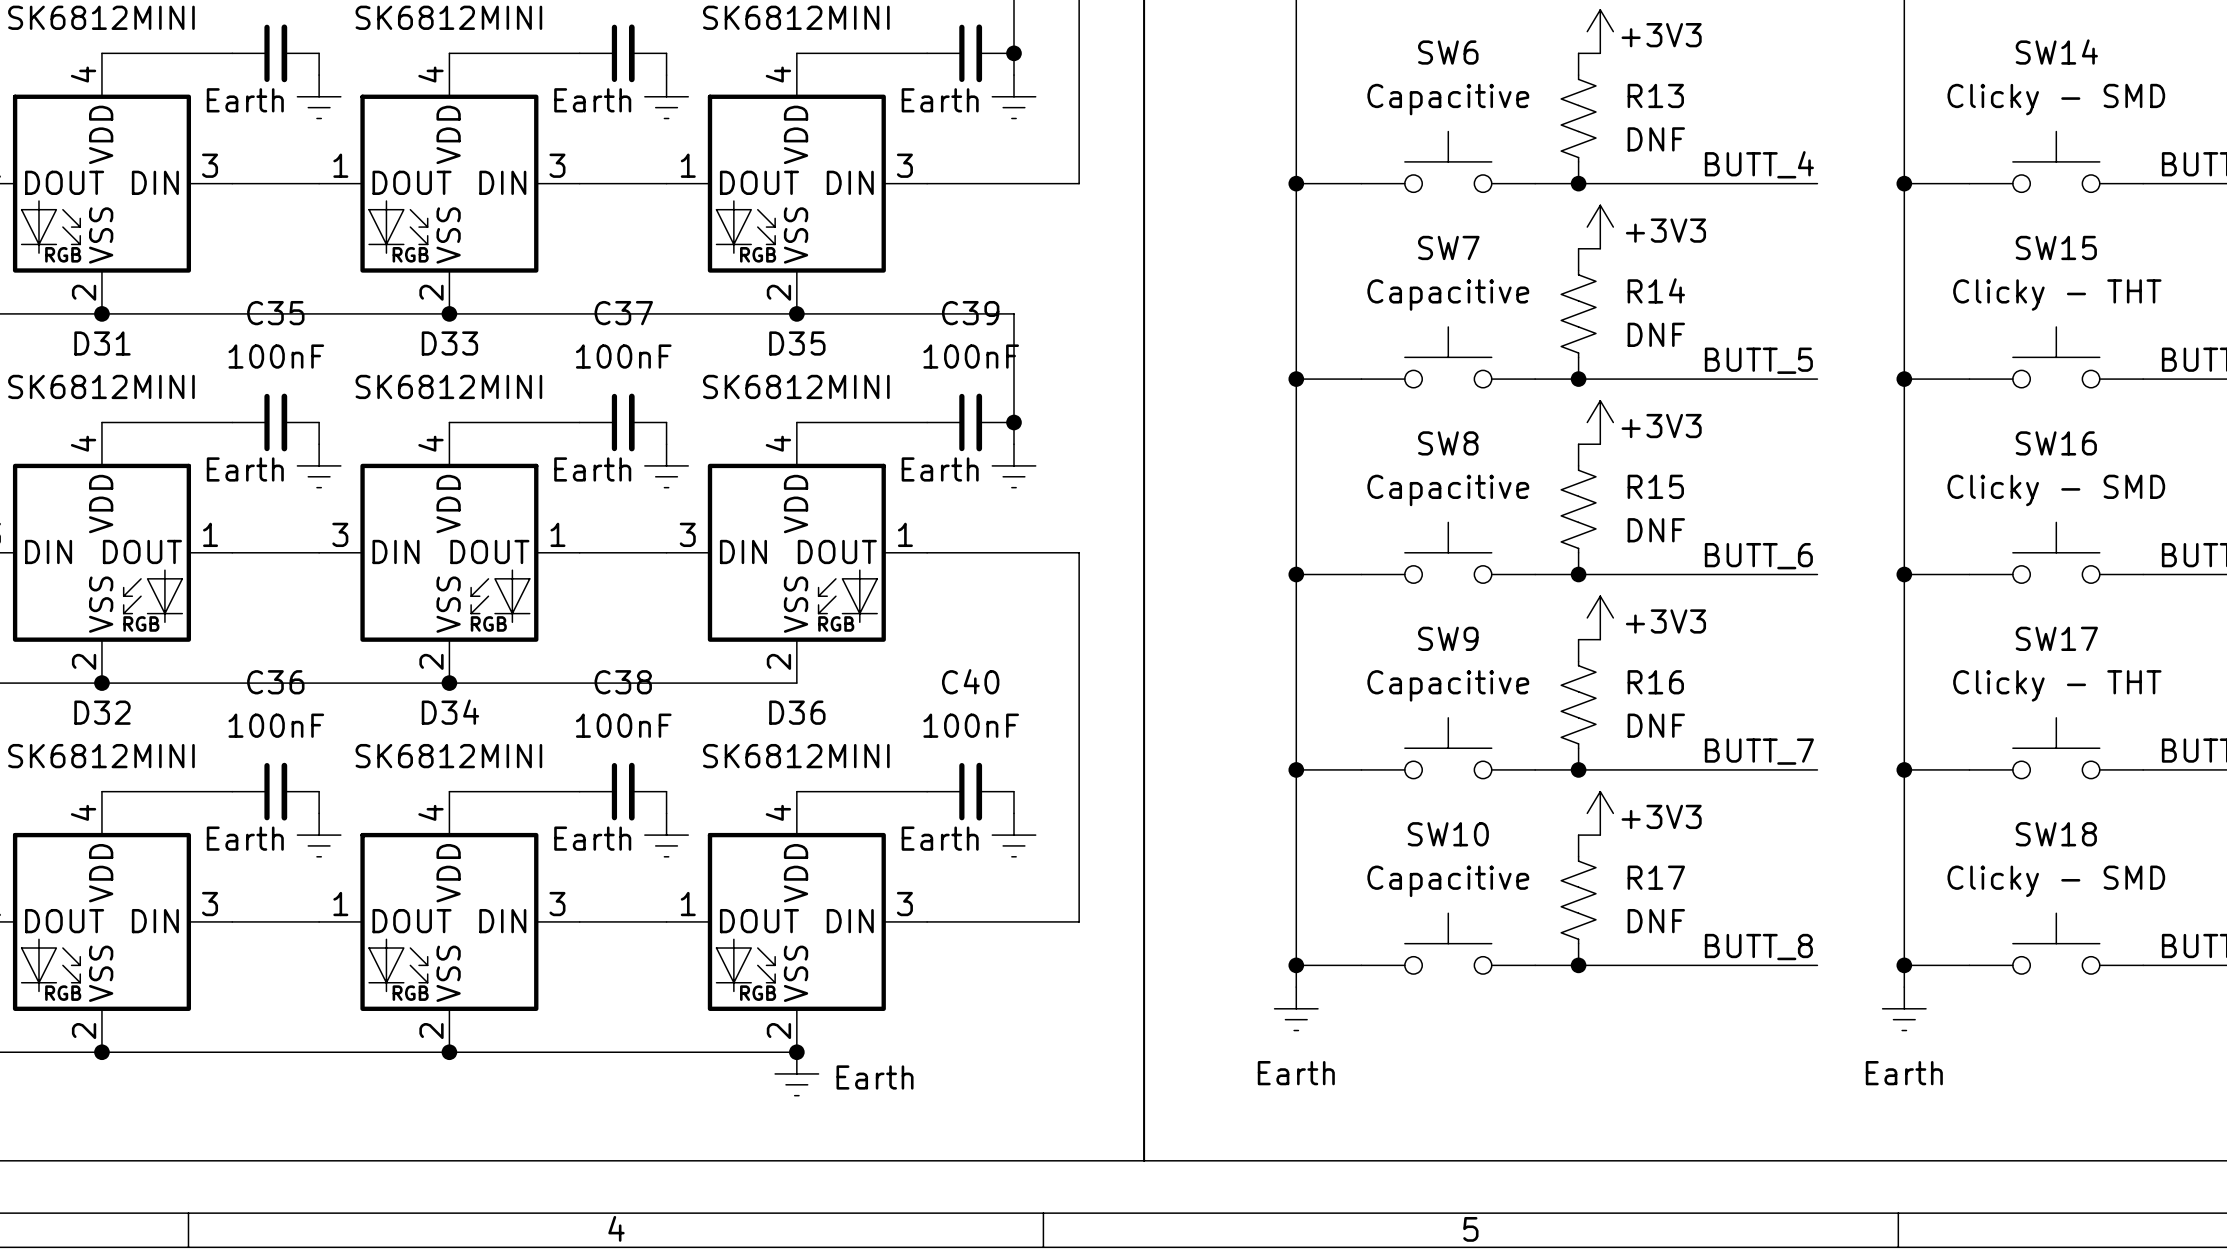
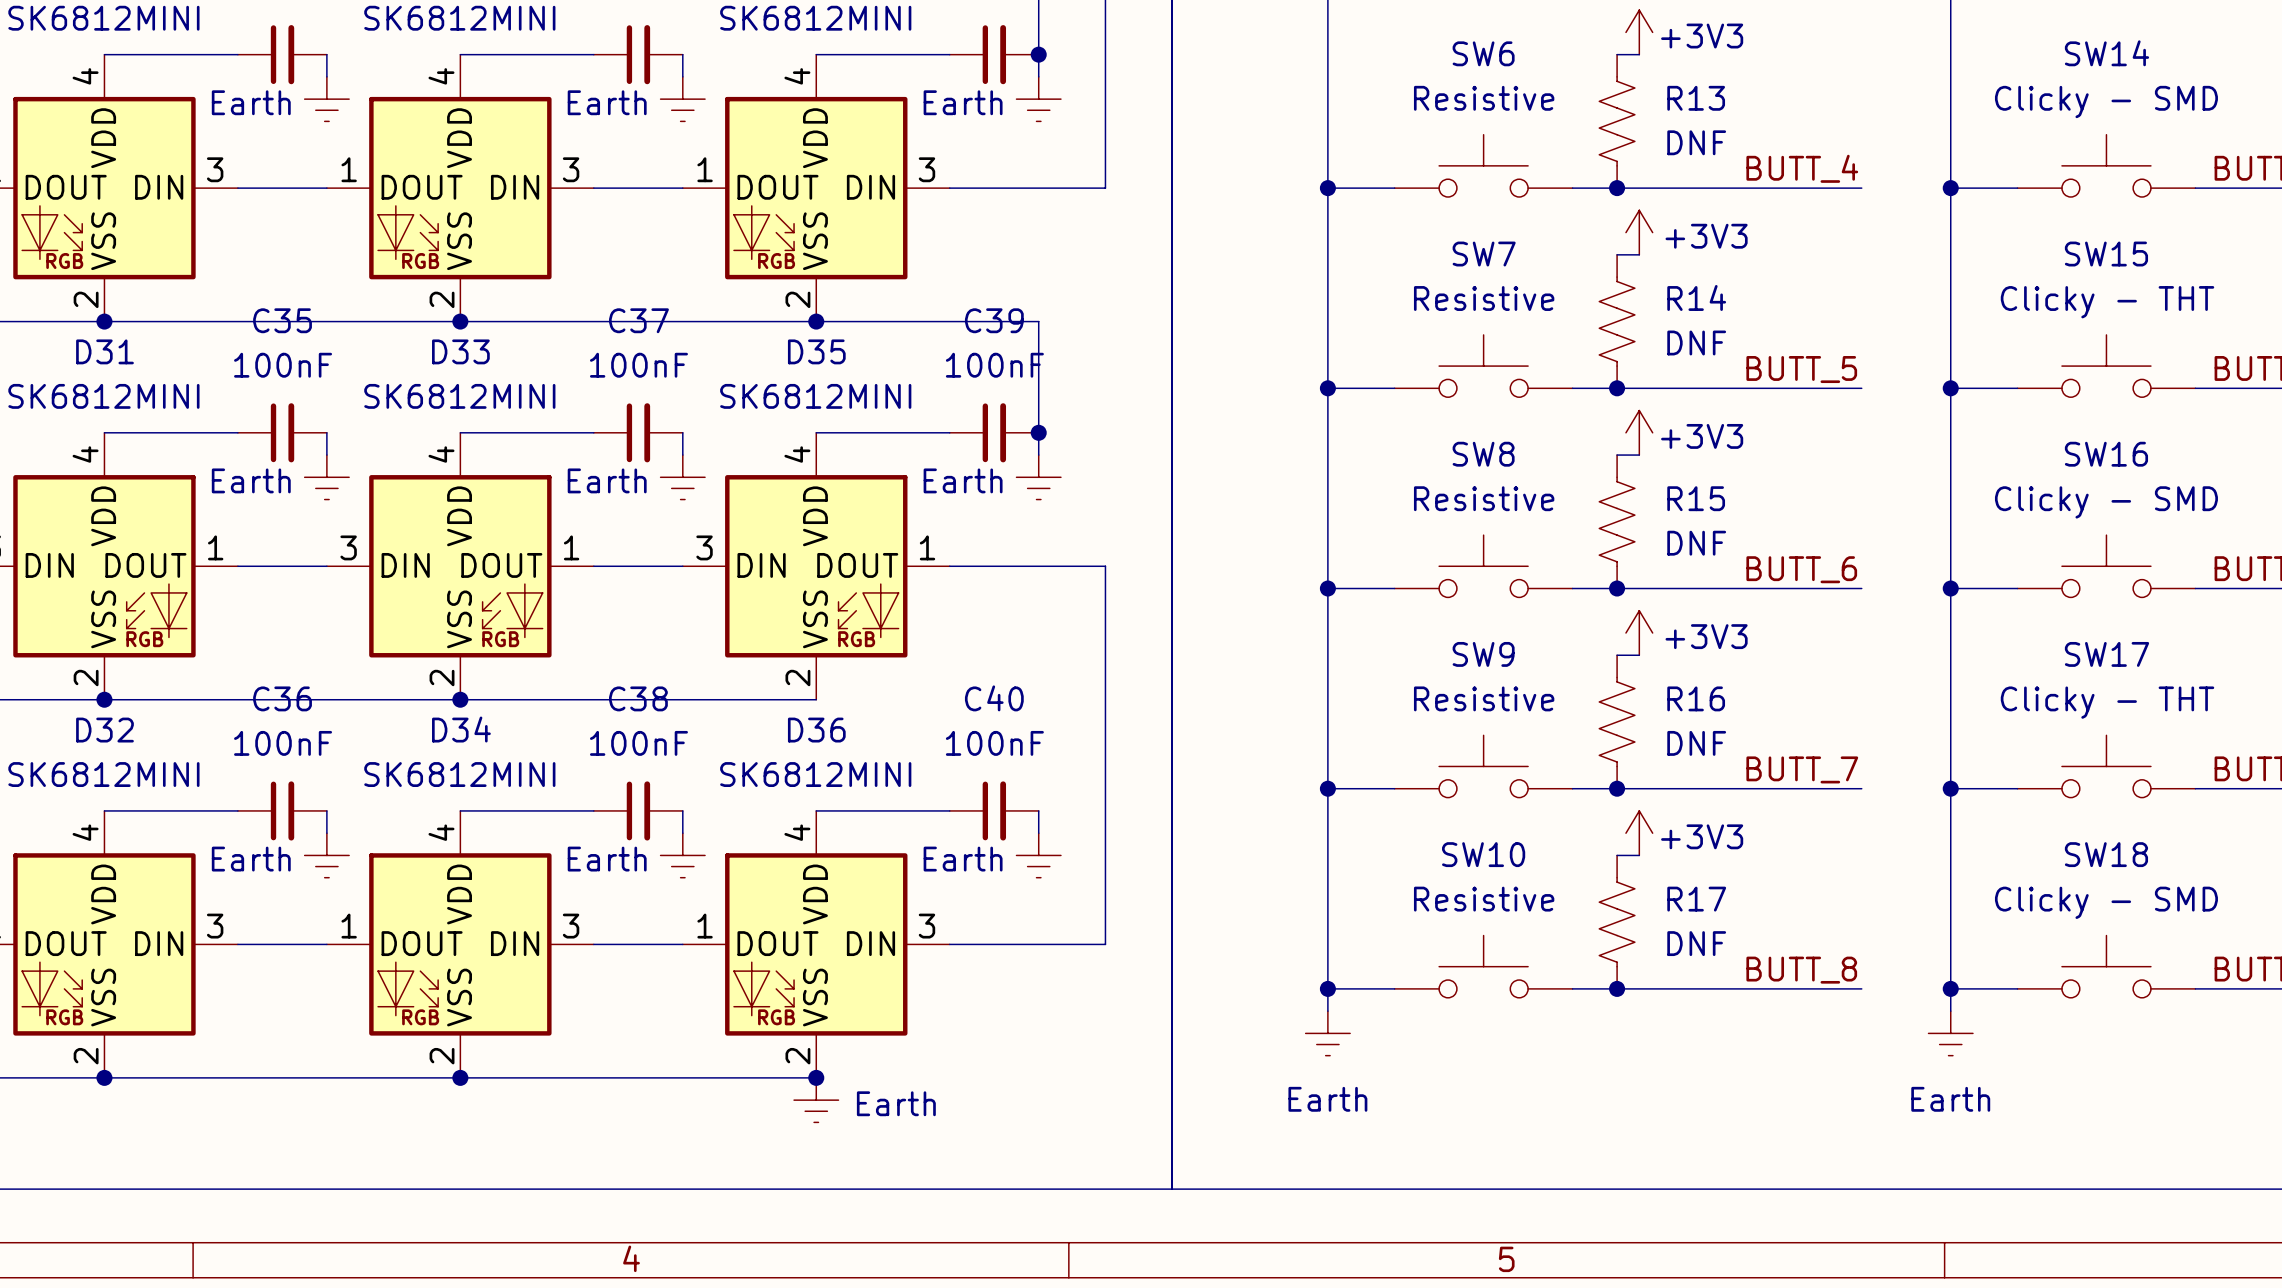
SW6 value: Capacitive (1448, 99) -> Resistive (1484, 98)
SW7 value: Capacitive (1448, 295) -> Resistive (1484, 298)
SW8 value: Capacitive (1448, 490) -> Resistive (1484, 498)
SW9 value: Capacitive (1448, 685) -> Resistive (1484, 698)
SW10 value: Capacitive (1448, 881) -> Resistive (1484, 899)

